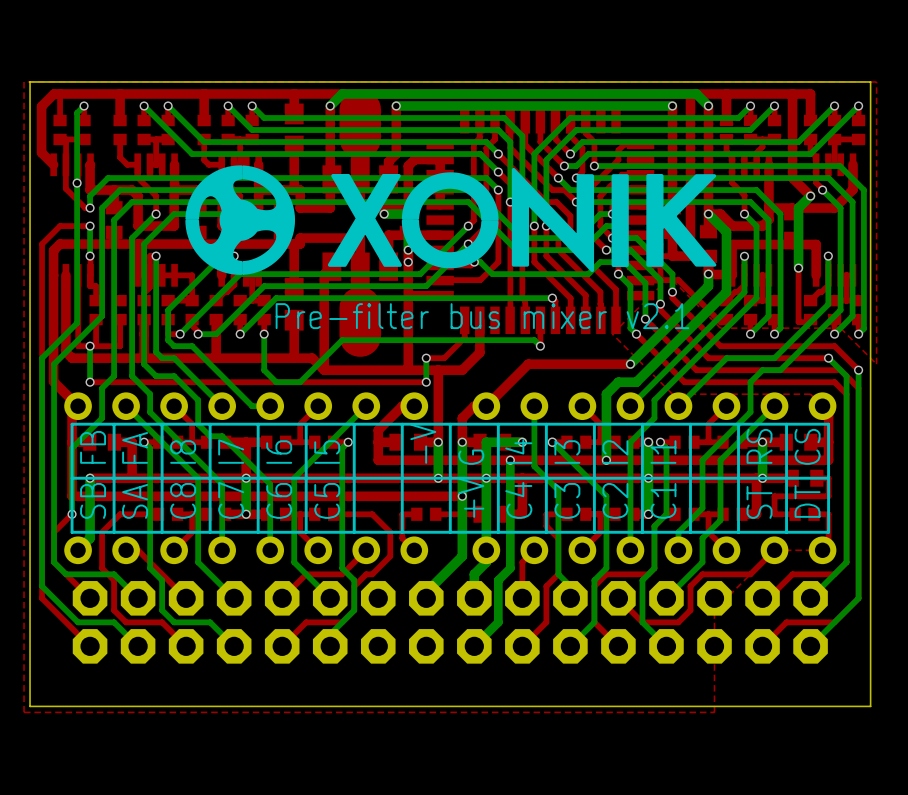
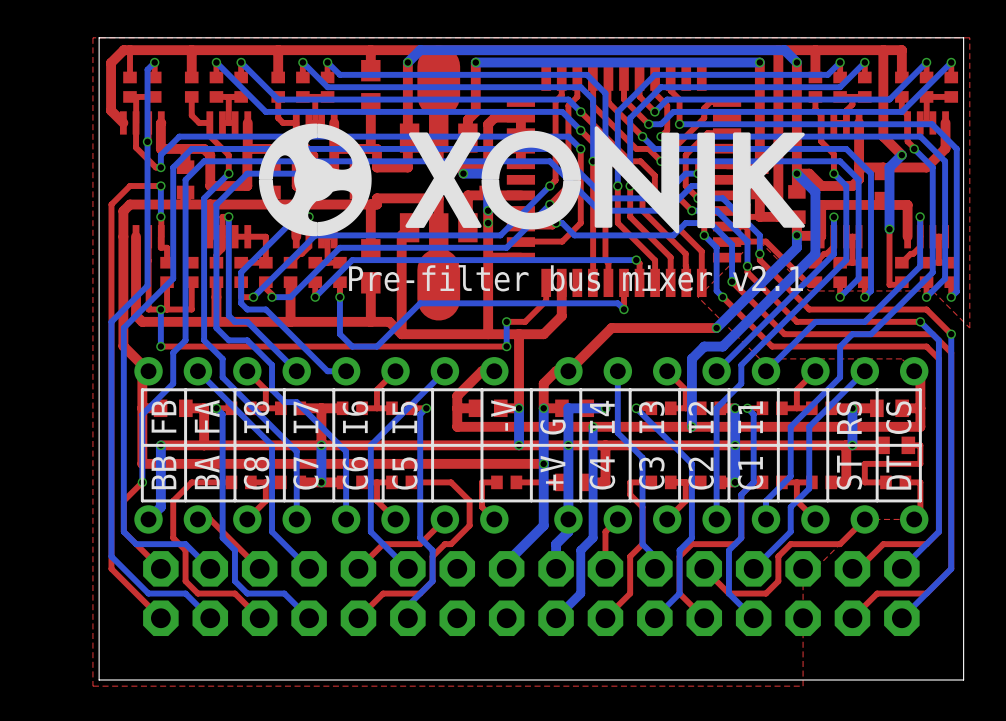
text: SB (93, 500) -> BB (163, 472)
text: SA (135, 501) -> BA (207, 472)

